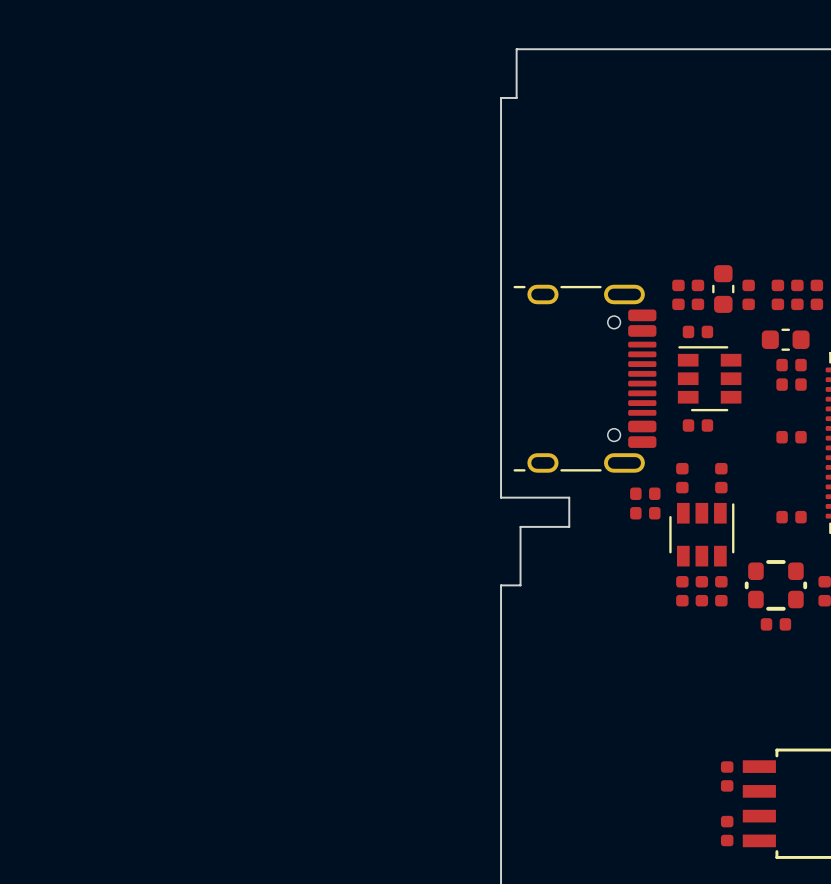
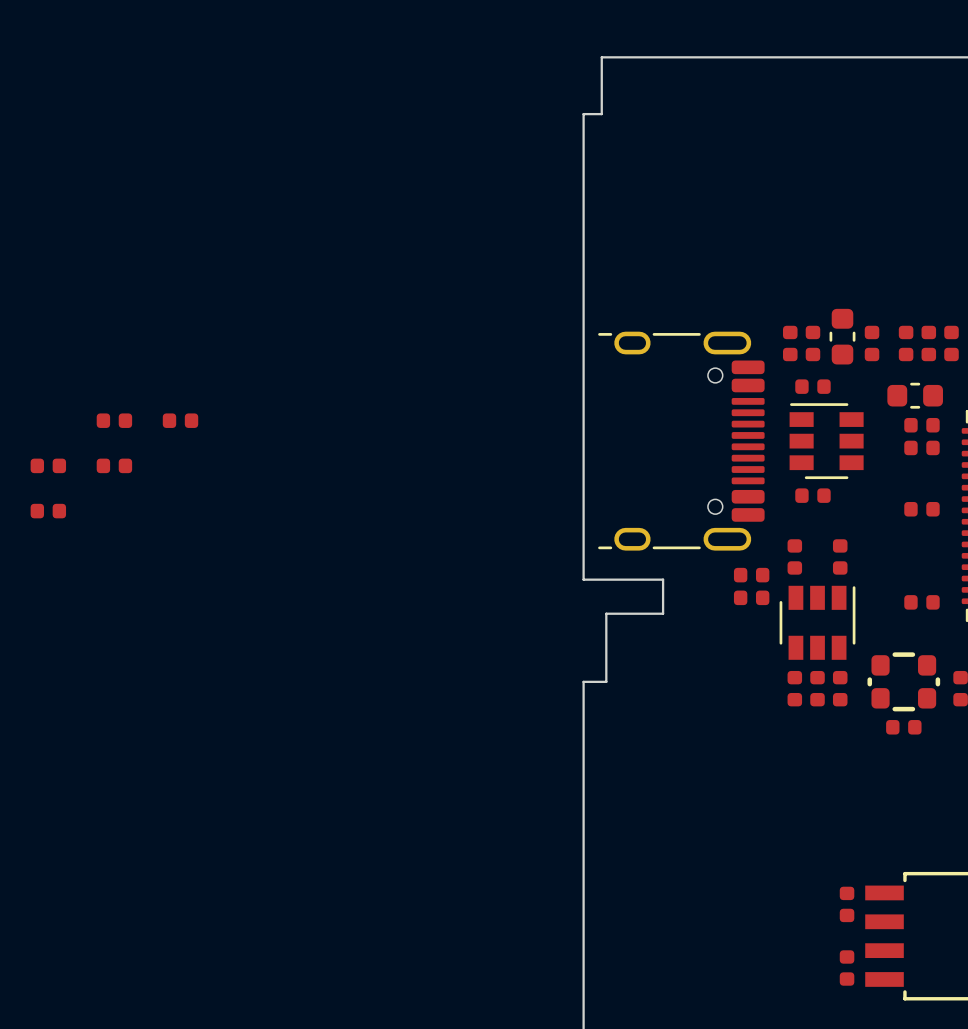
part: none -> (114, 420)
part: none -> (180, 420)
part: none -> (48, 465)
part: none -> (114, 465)
part: none -> (48, 511)

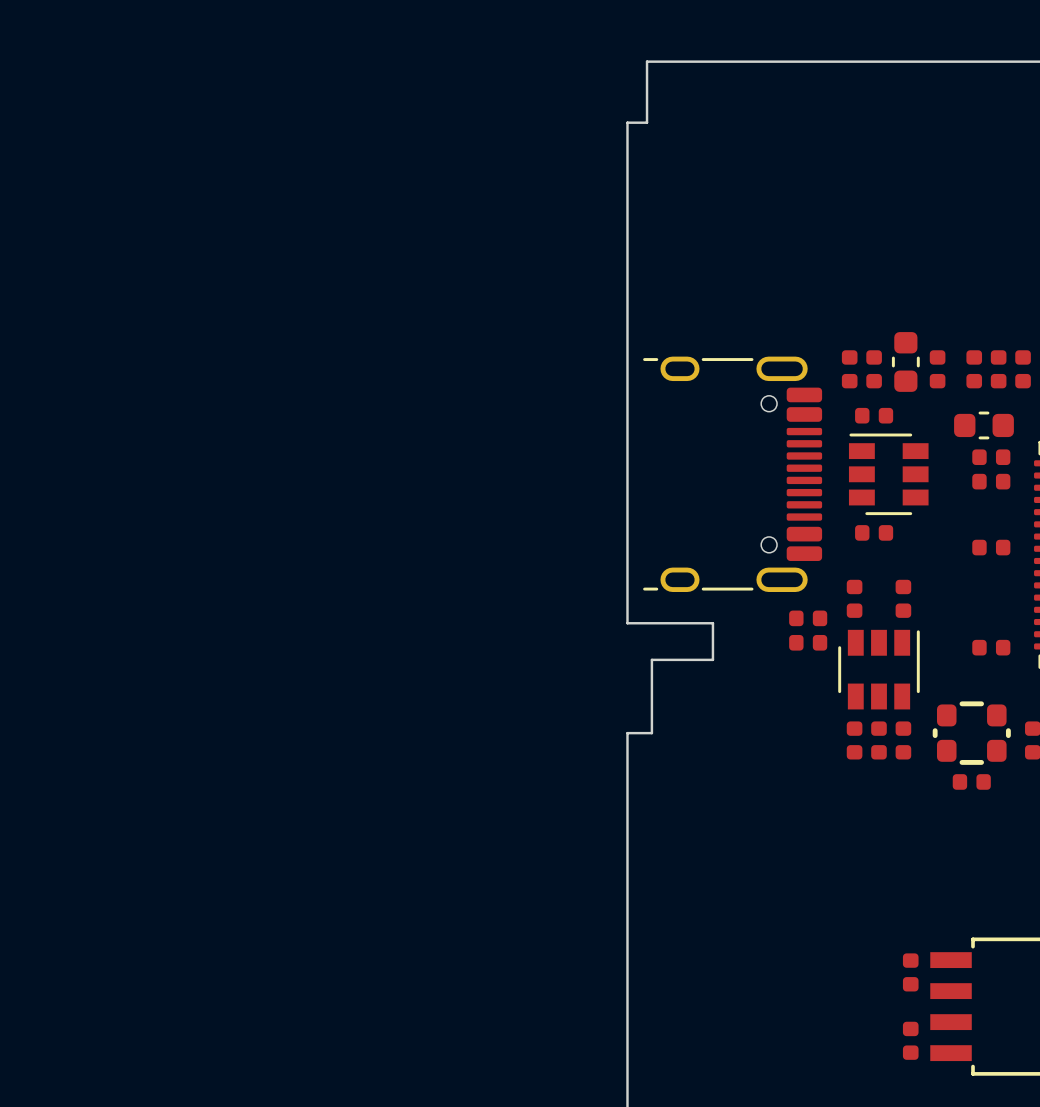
part: (114, 420) -> none
part: (180, 420) -> none
part: (48, 465) -> none
part: (114, 465) -> none
part: (48, 511) -> none

